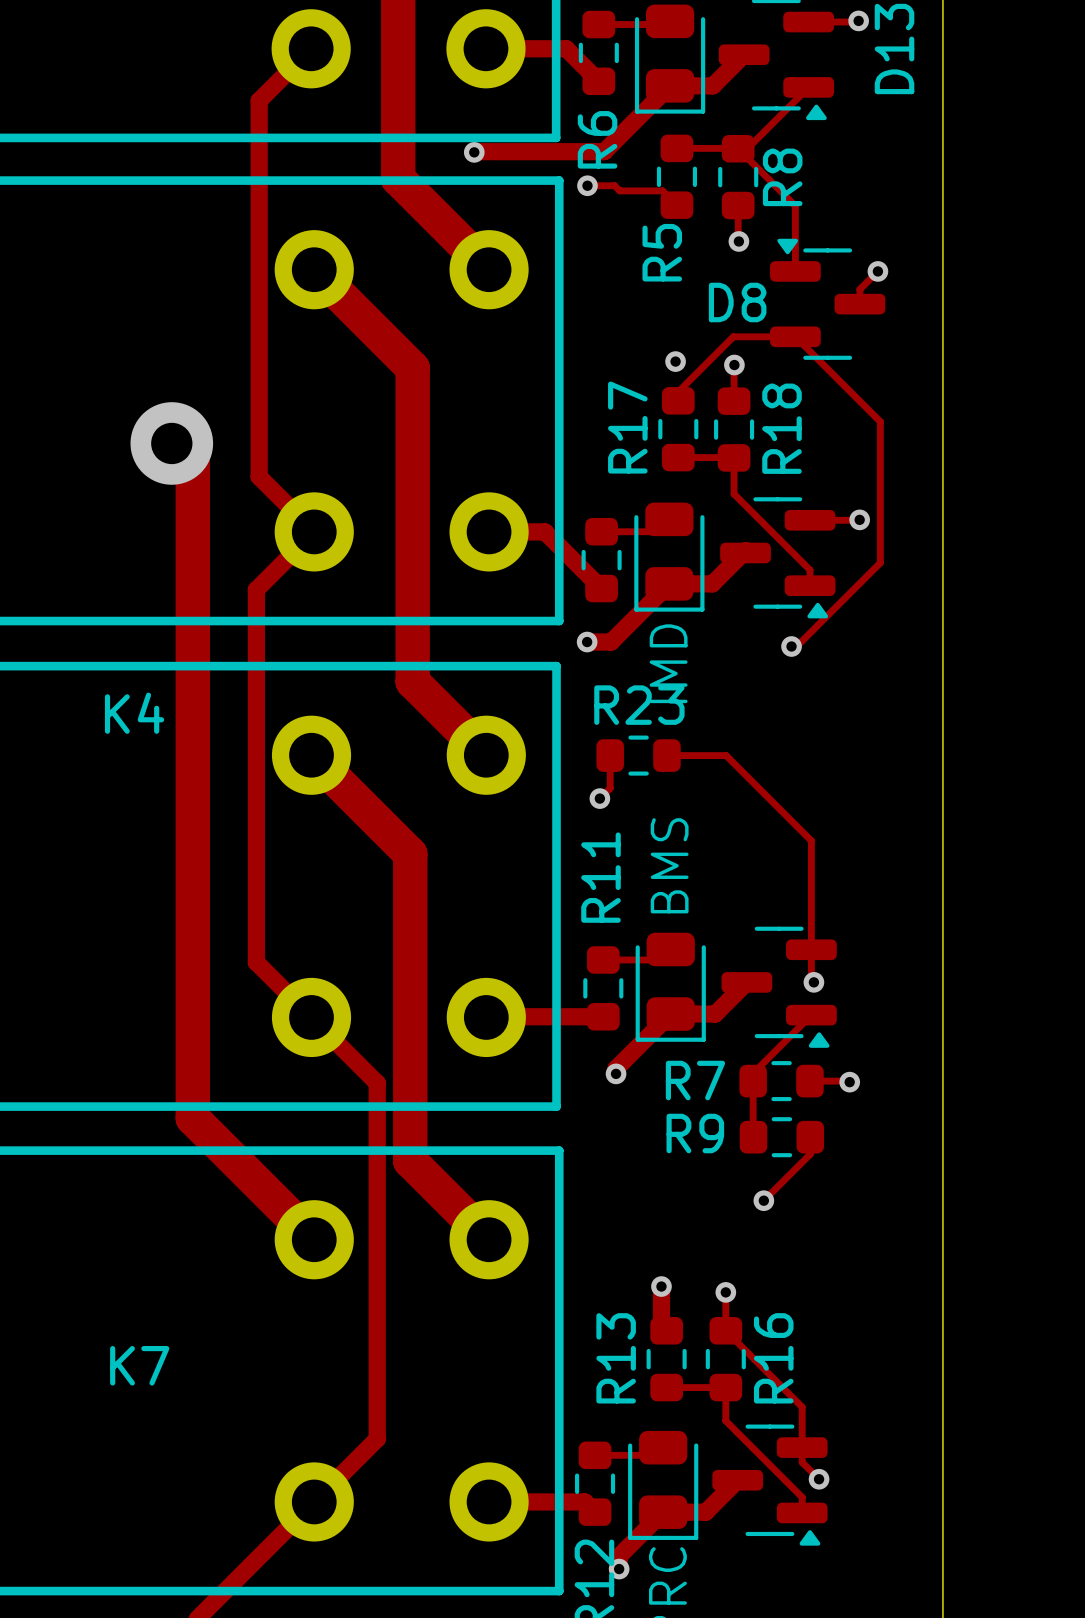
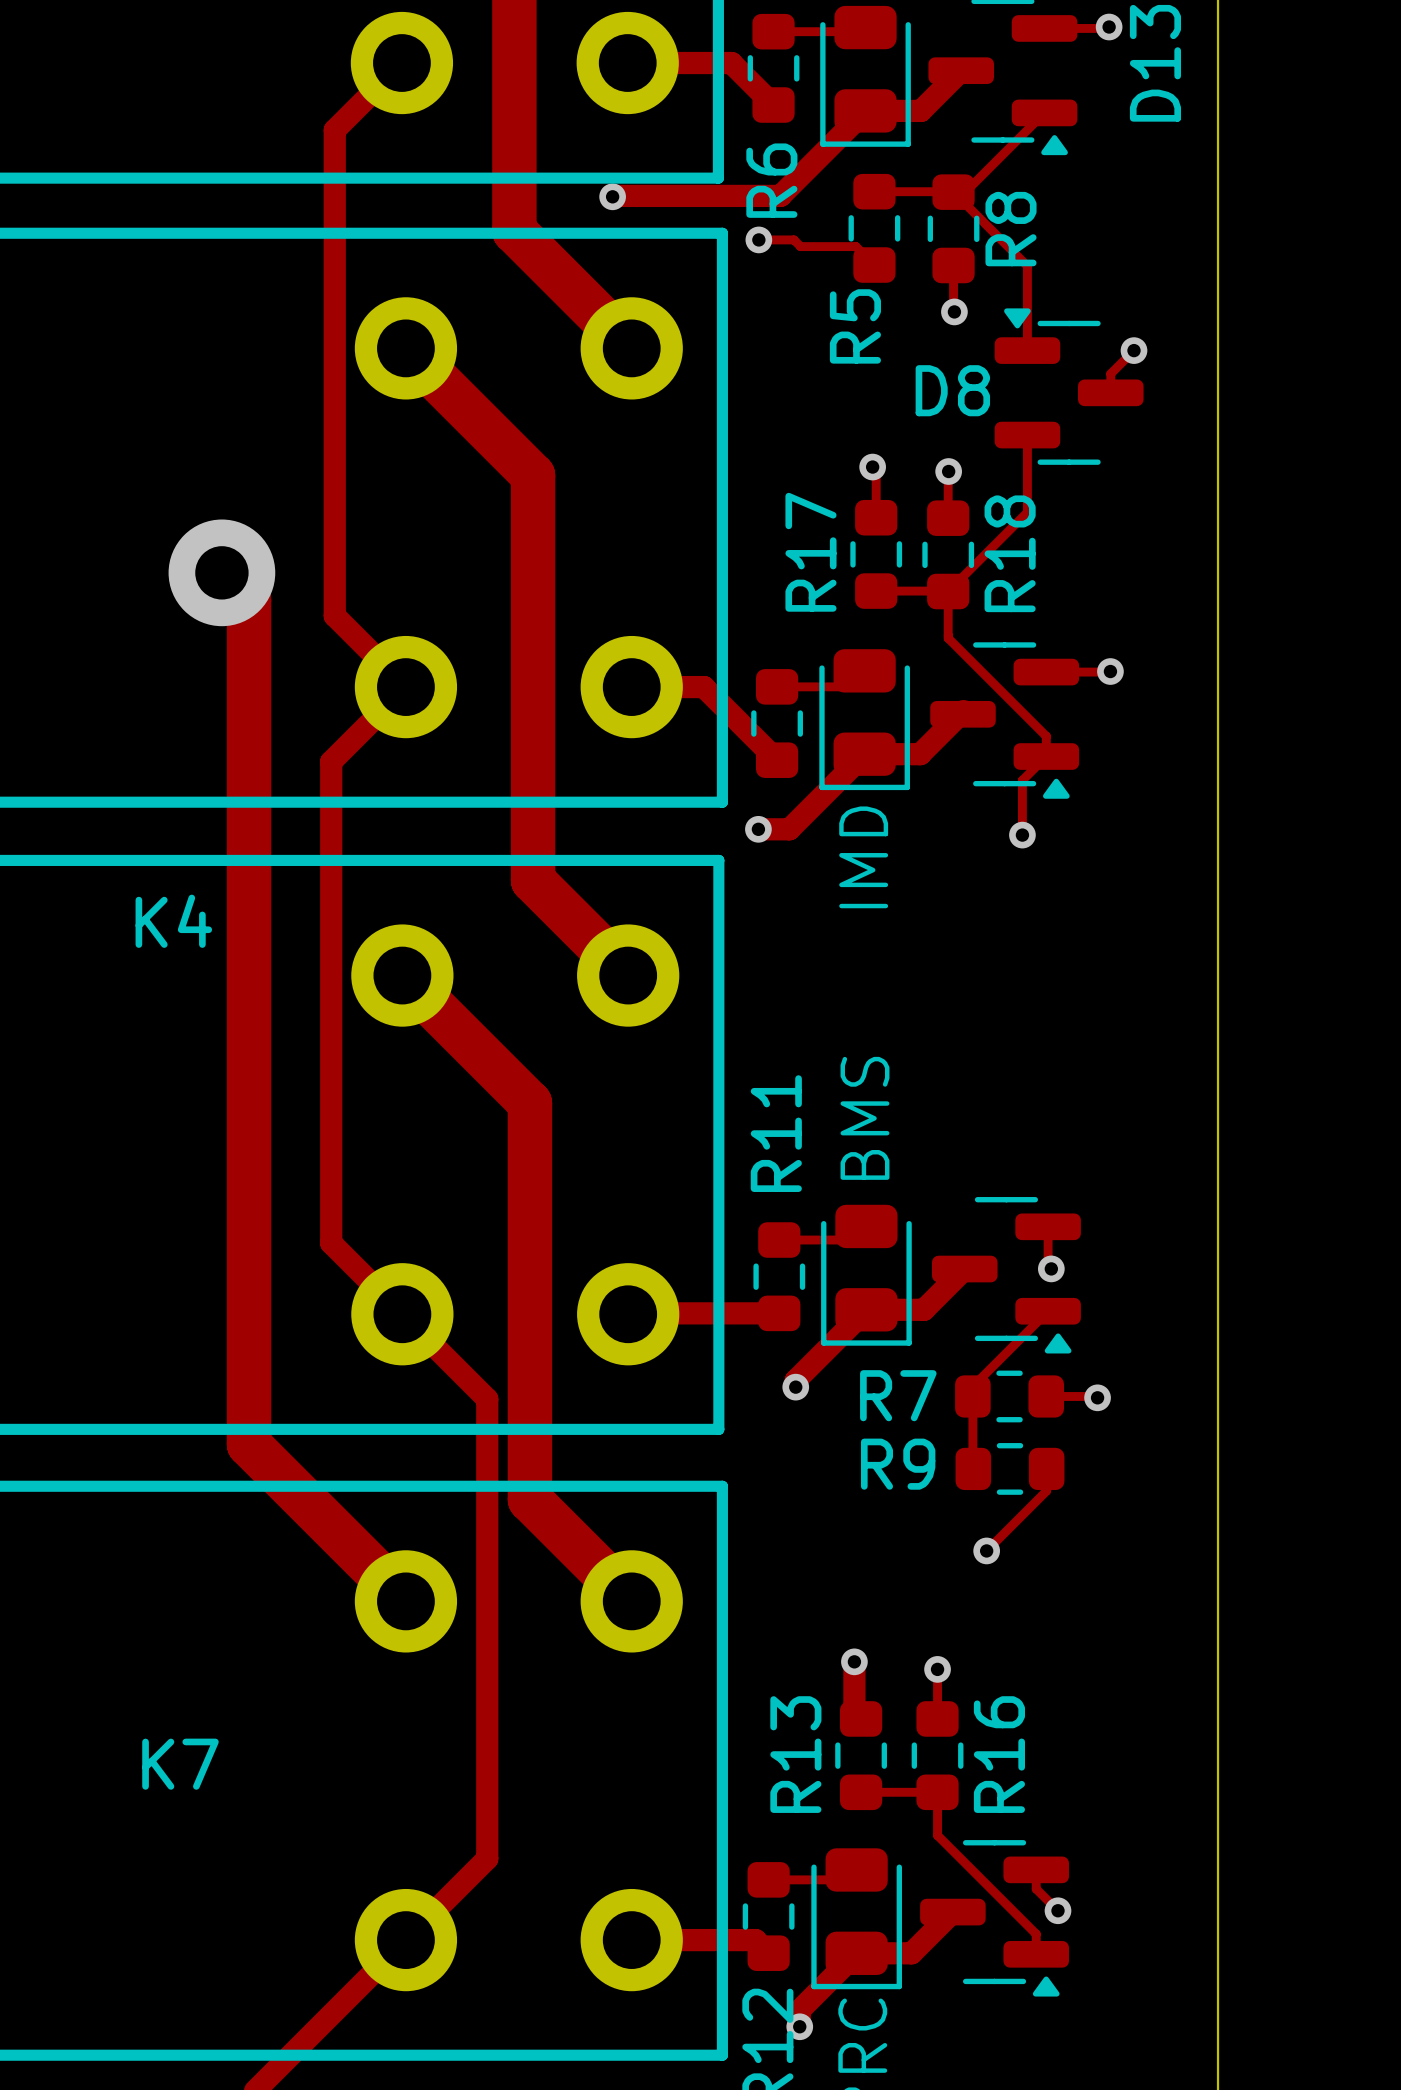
track: none -> (1027, 435) (1027, 512) (948, 591)
track: none -> (876, 470) (876, 506)
track: (678, 391) (733, 336) (795, 336) (880, 421) (880, 562) (796, 646) (791, 646) -> (1046, 756) (1022, 780) (1022, 835)
track: (610, 755) (610, 788) (599, 798) -> none
R23: (638, 755) -> none
track: (666, 755) (726, 755) (811, 840) (811, 949) -> none
via: (599, 798) -> none
track: (725, 1330) (802, 1407) (802, 1447) -> none

